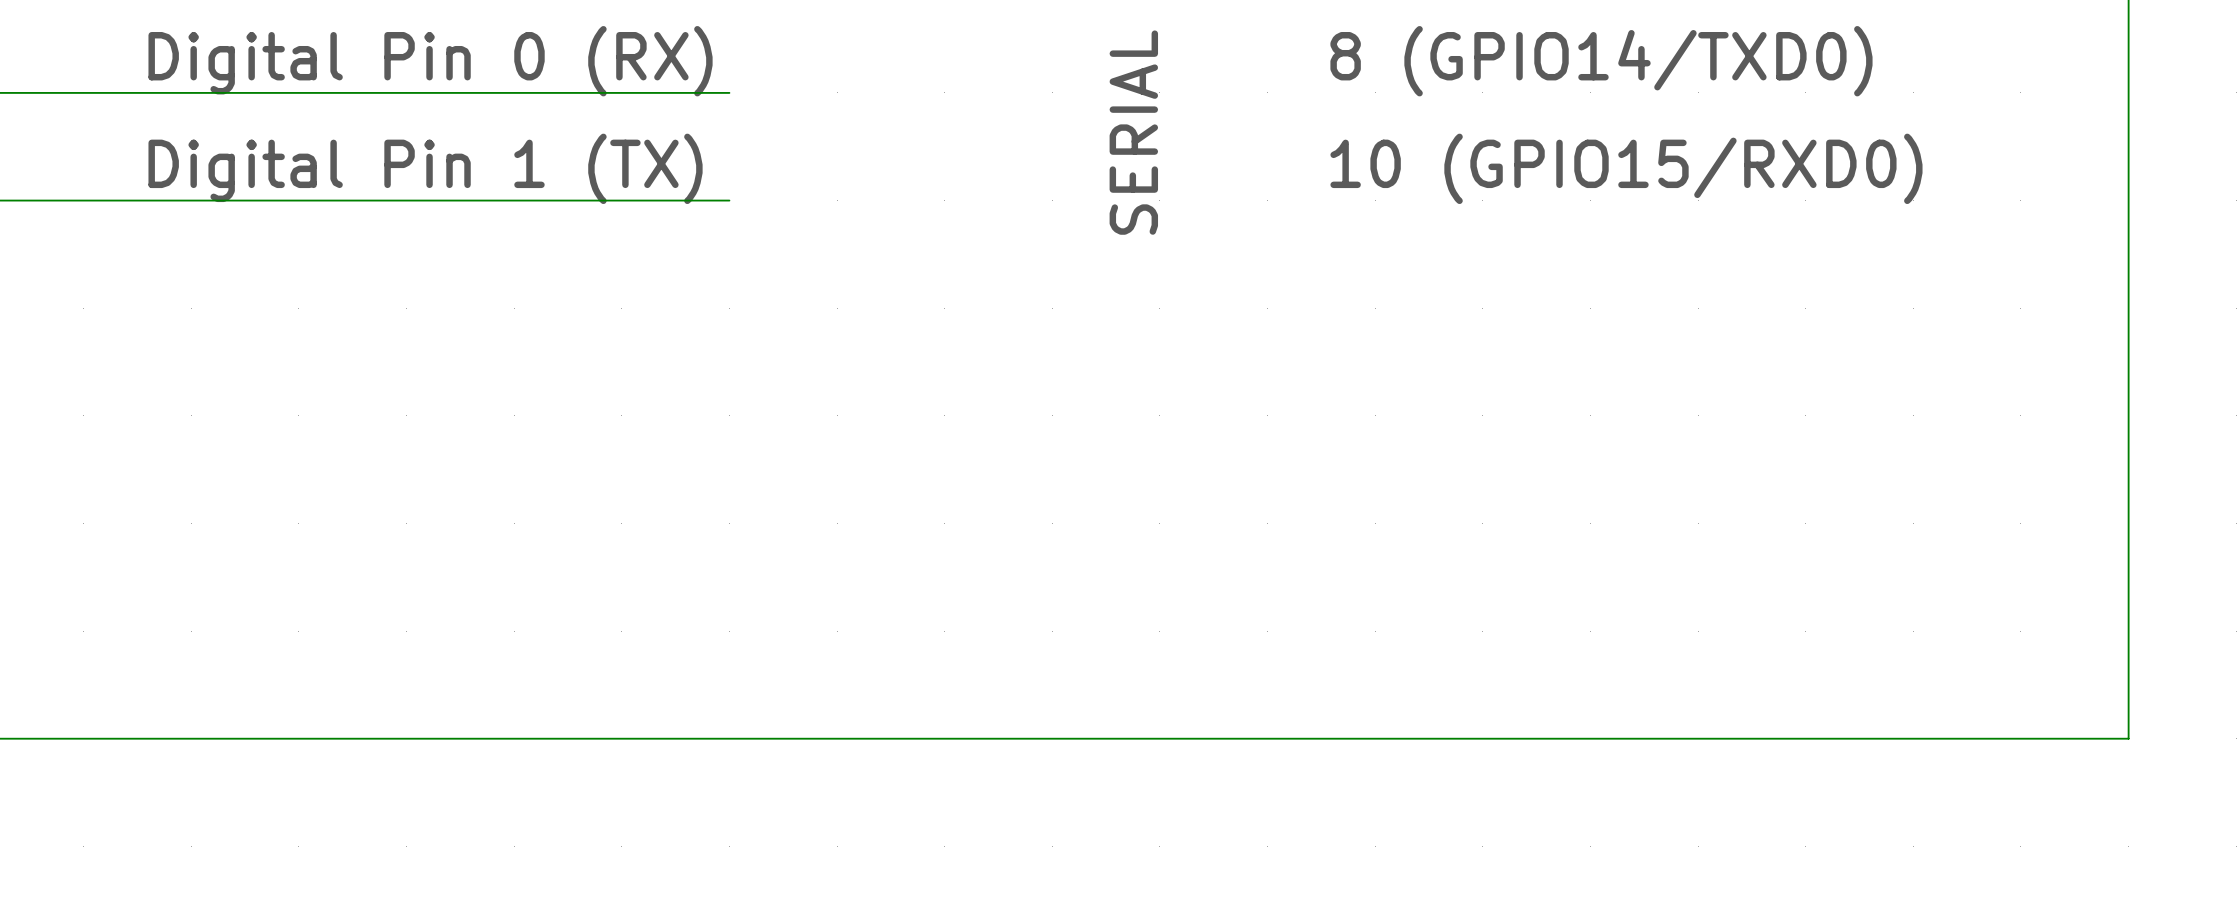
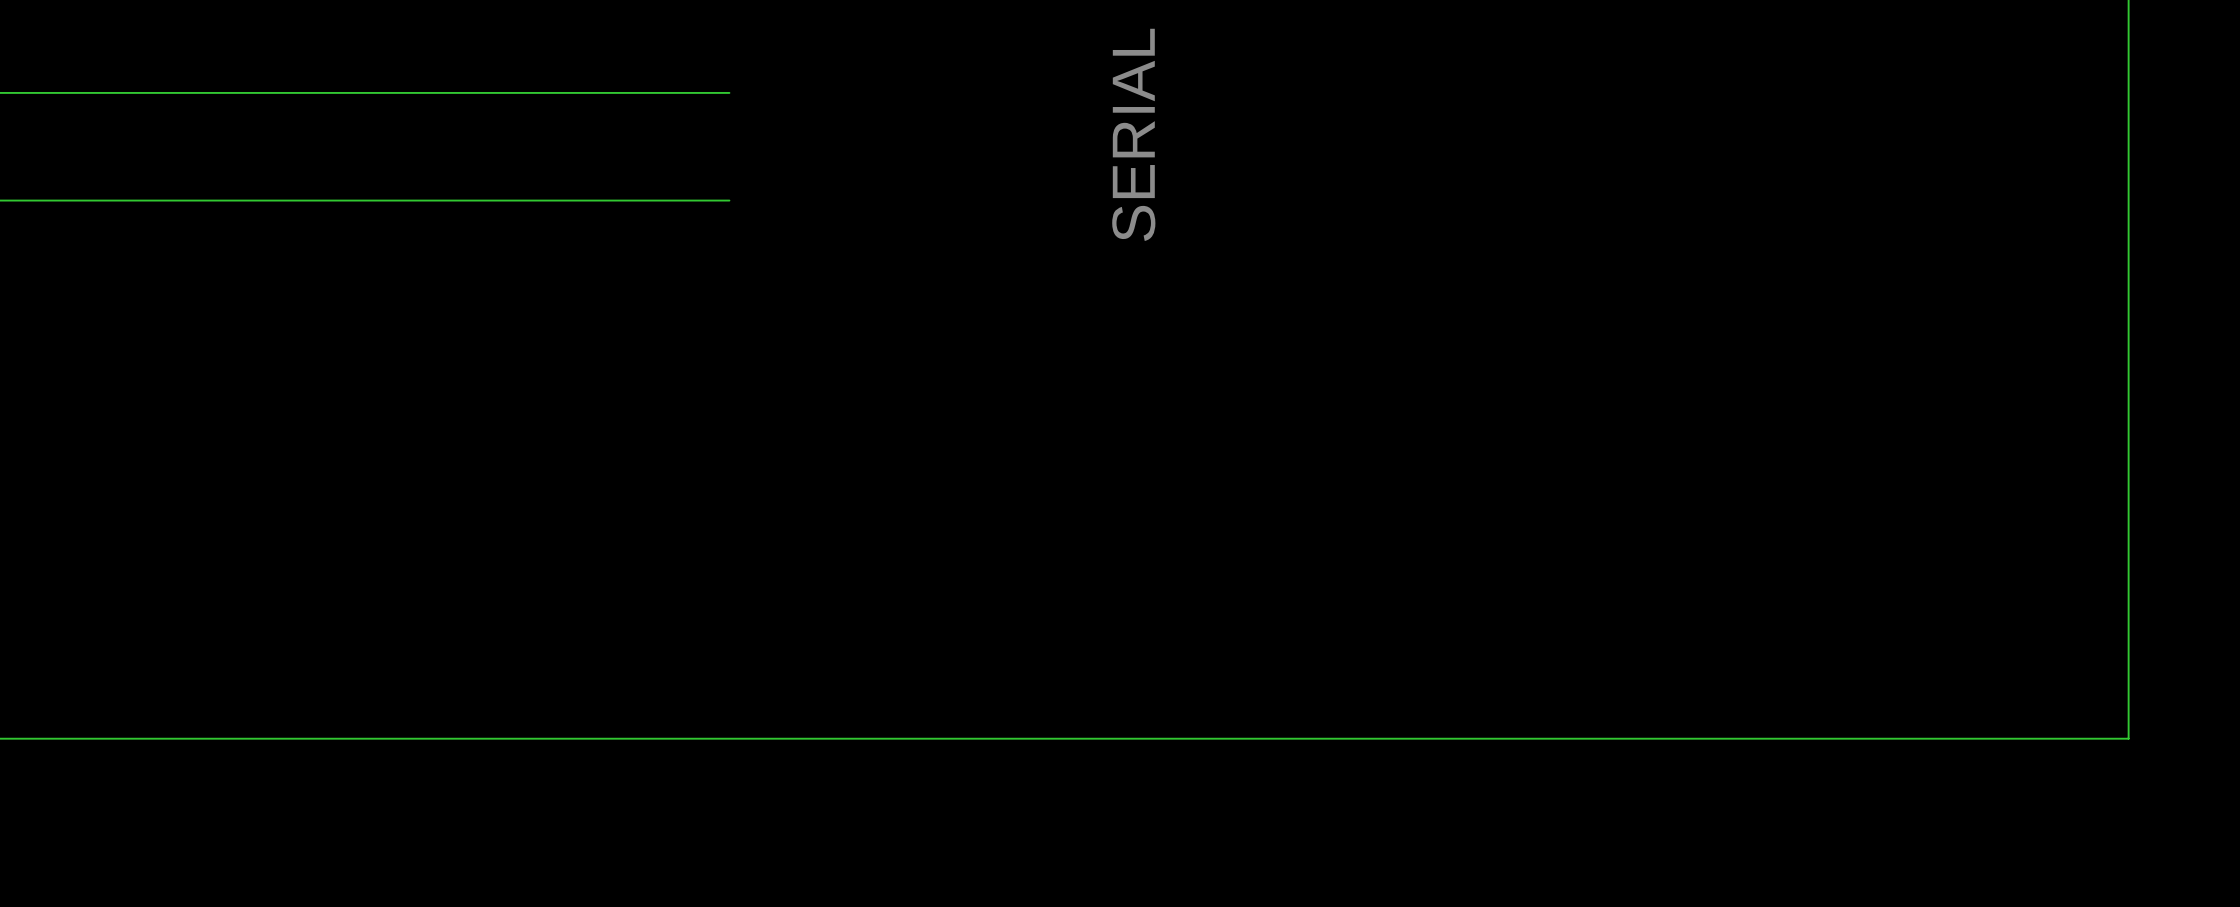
text: Digital Pin 0 (RX) (430, 61) -> none
text: 8 (GPIO14/TXD0) (1601, 61) -> none
text: Digital Pin 1 (TX) (425, 168) -> none
text: 10 (GPIO15/RXD0) (1626, 168) -> none

